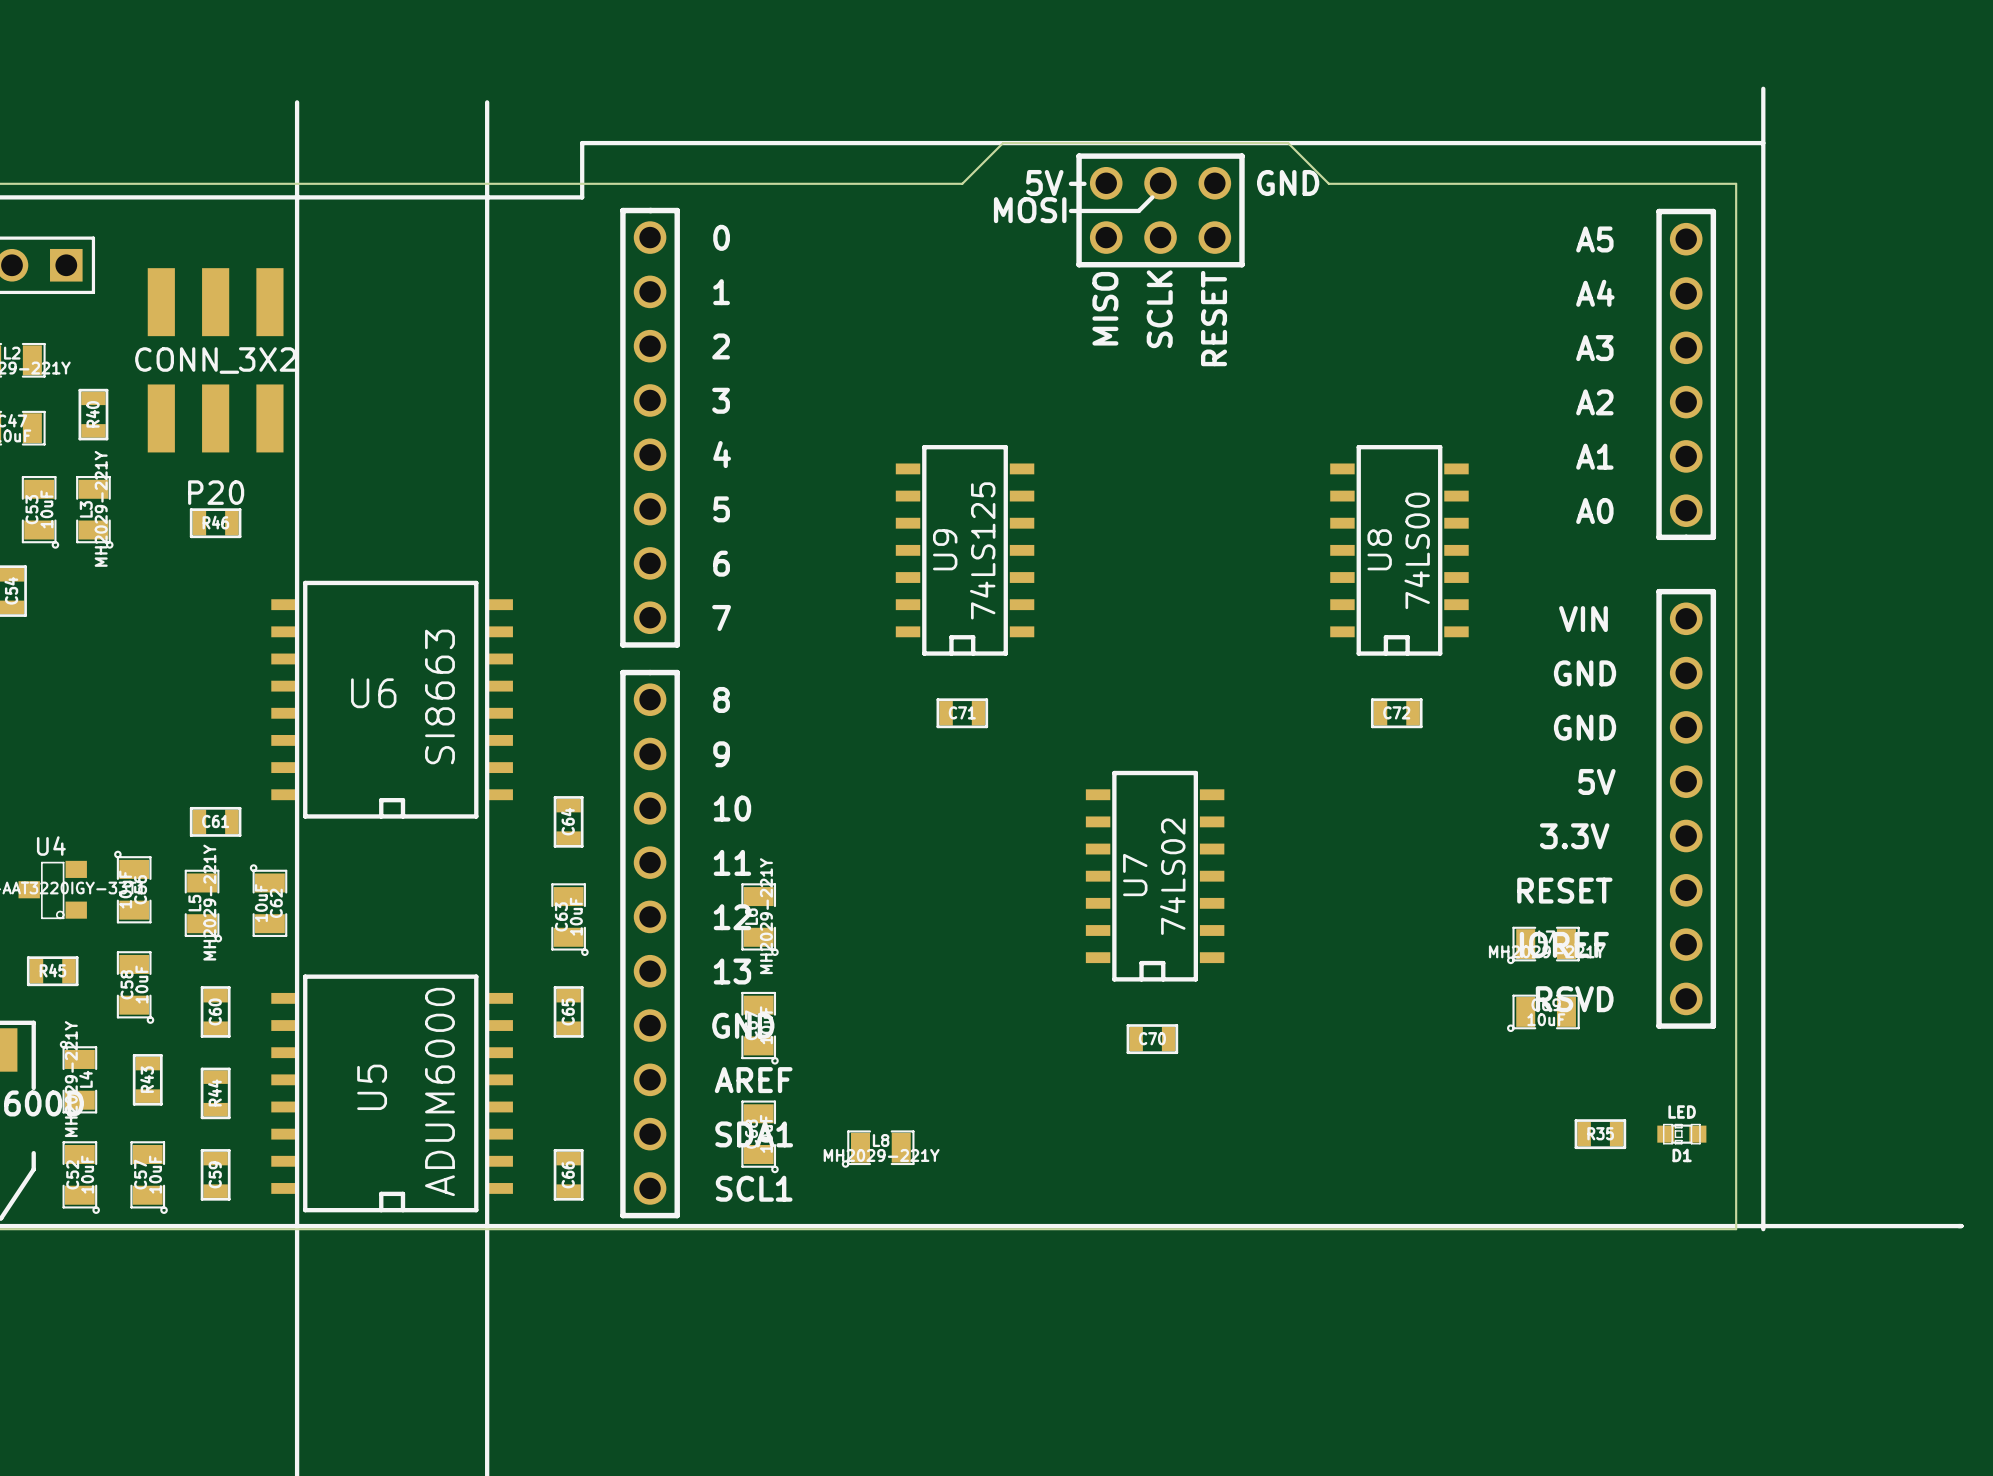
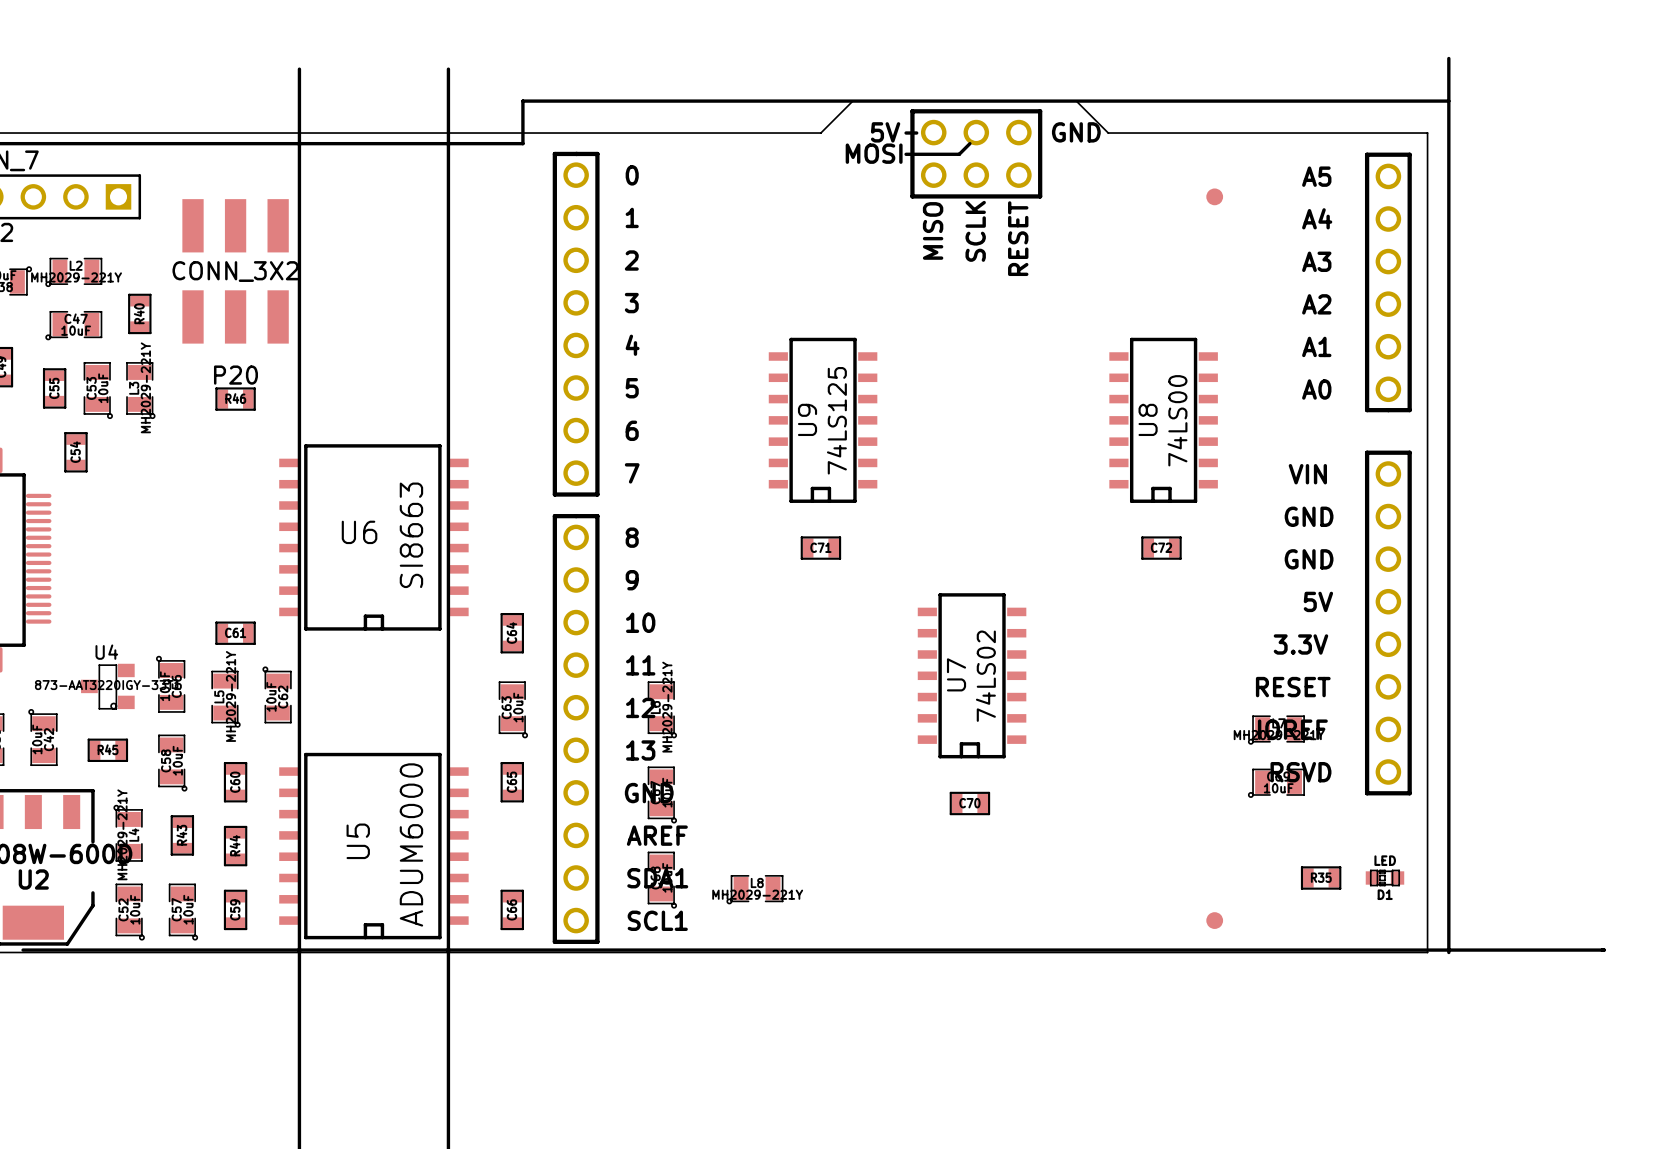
part: none -> (1214, 196)
part: none -> (1214, 920)

